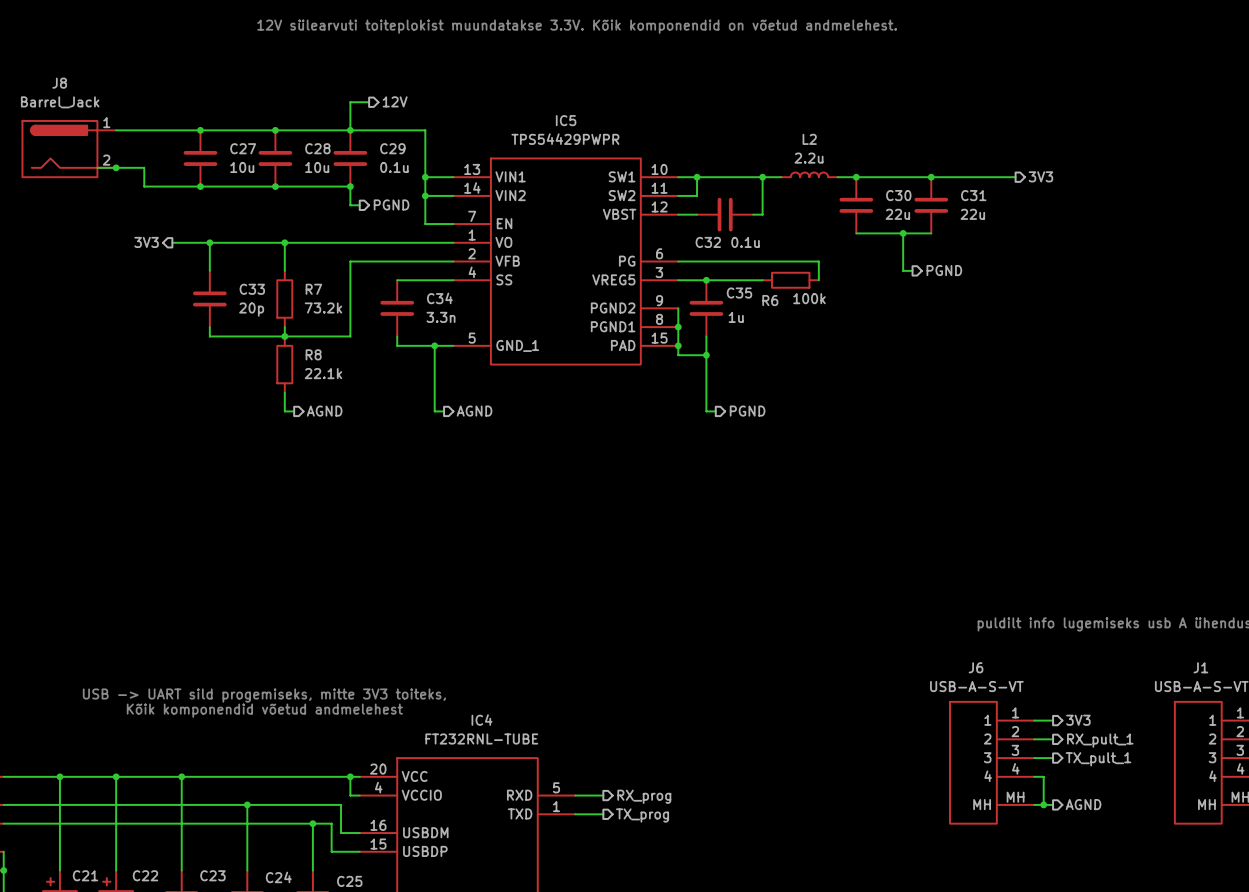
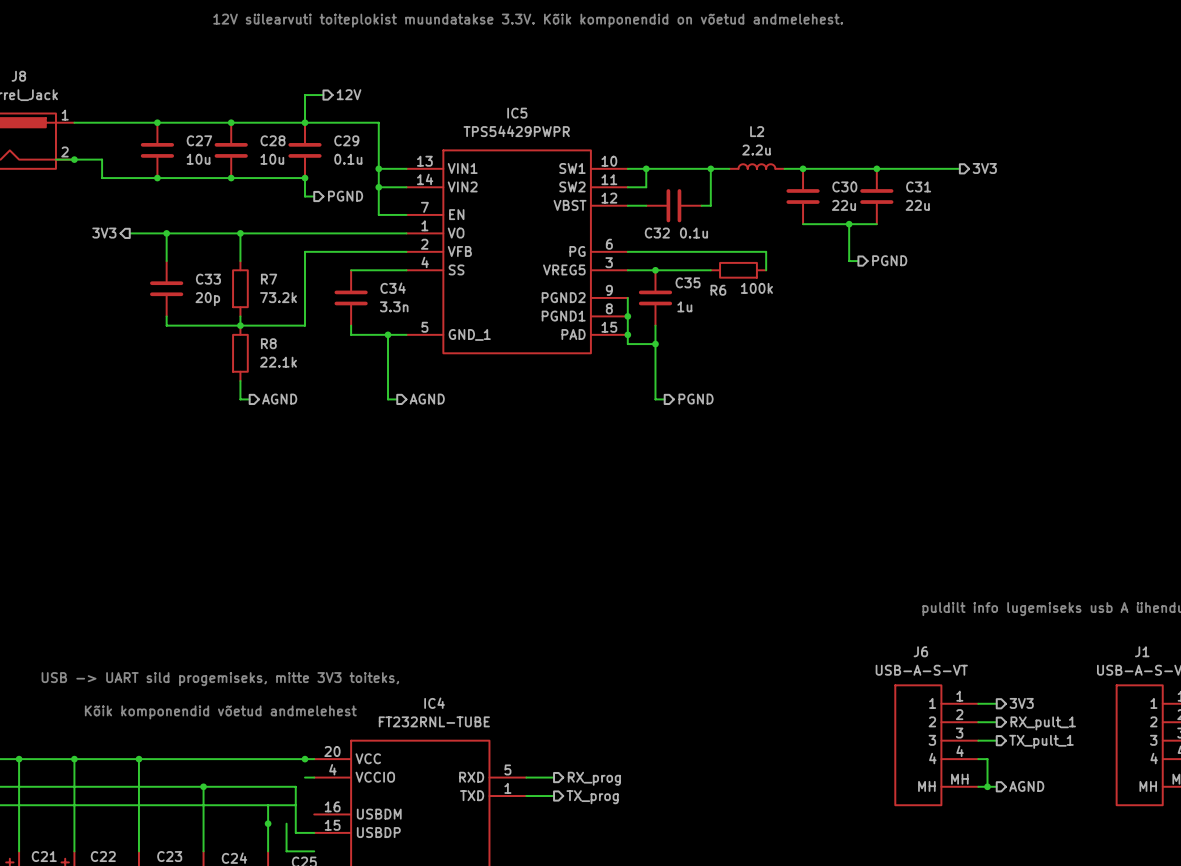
text position: Kõik komponendid võetud andmelehest (264, 710) -> Kõik komponendid võetud andmelehest (220, 712)
wire: (350, 776) (350, 795) -> none
junction position: (312, 823) -> (268, 823)
wire: (331, 823) (331, 842) -> (286, 805) (295, 805)
wire: (341, 833) (359, 833) -> none
wire: (331, 851) (341, 851) -> (295, 814) (295, 832)
wire: none -> (286, 832) (286, 851) (314, 851)

